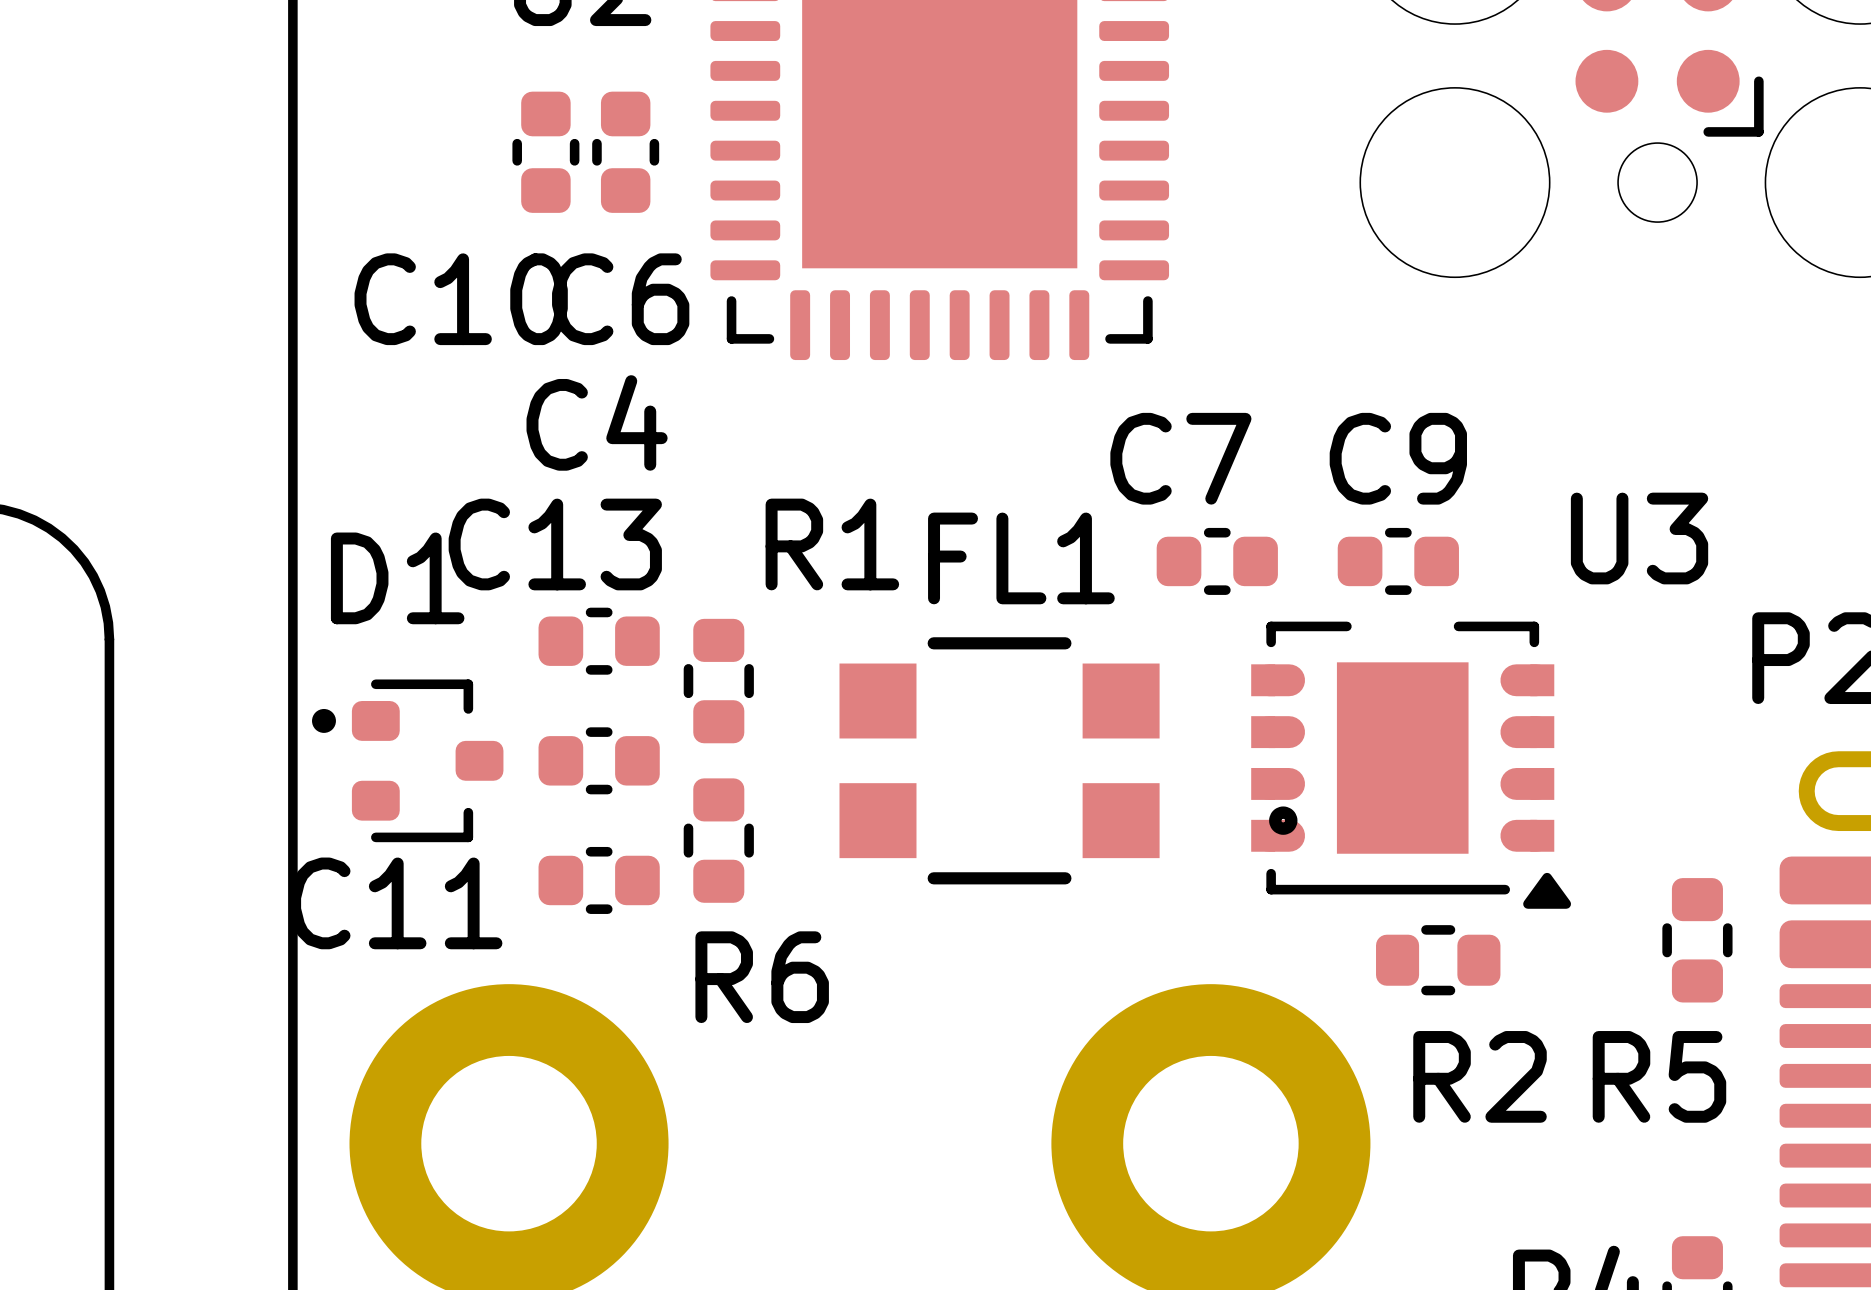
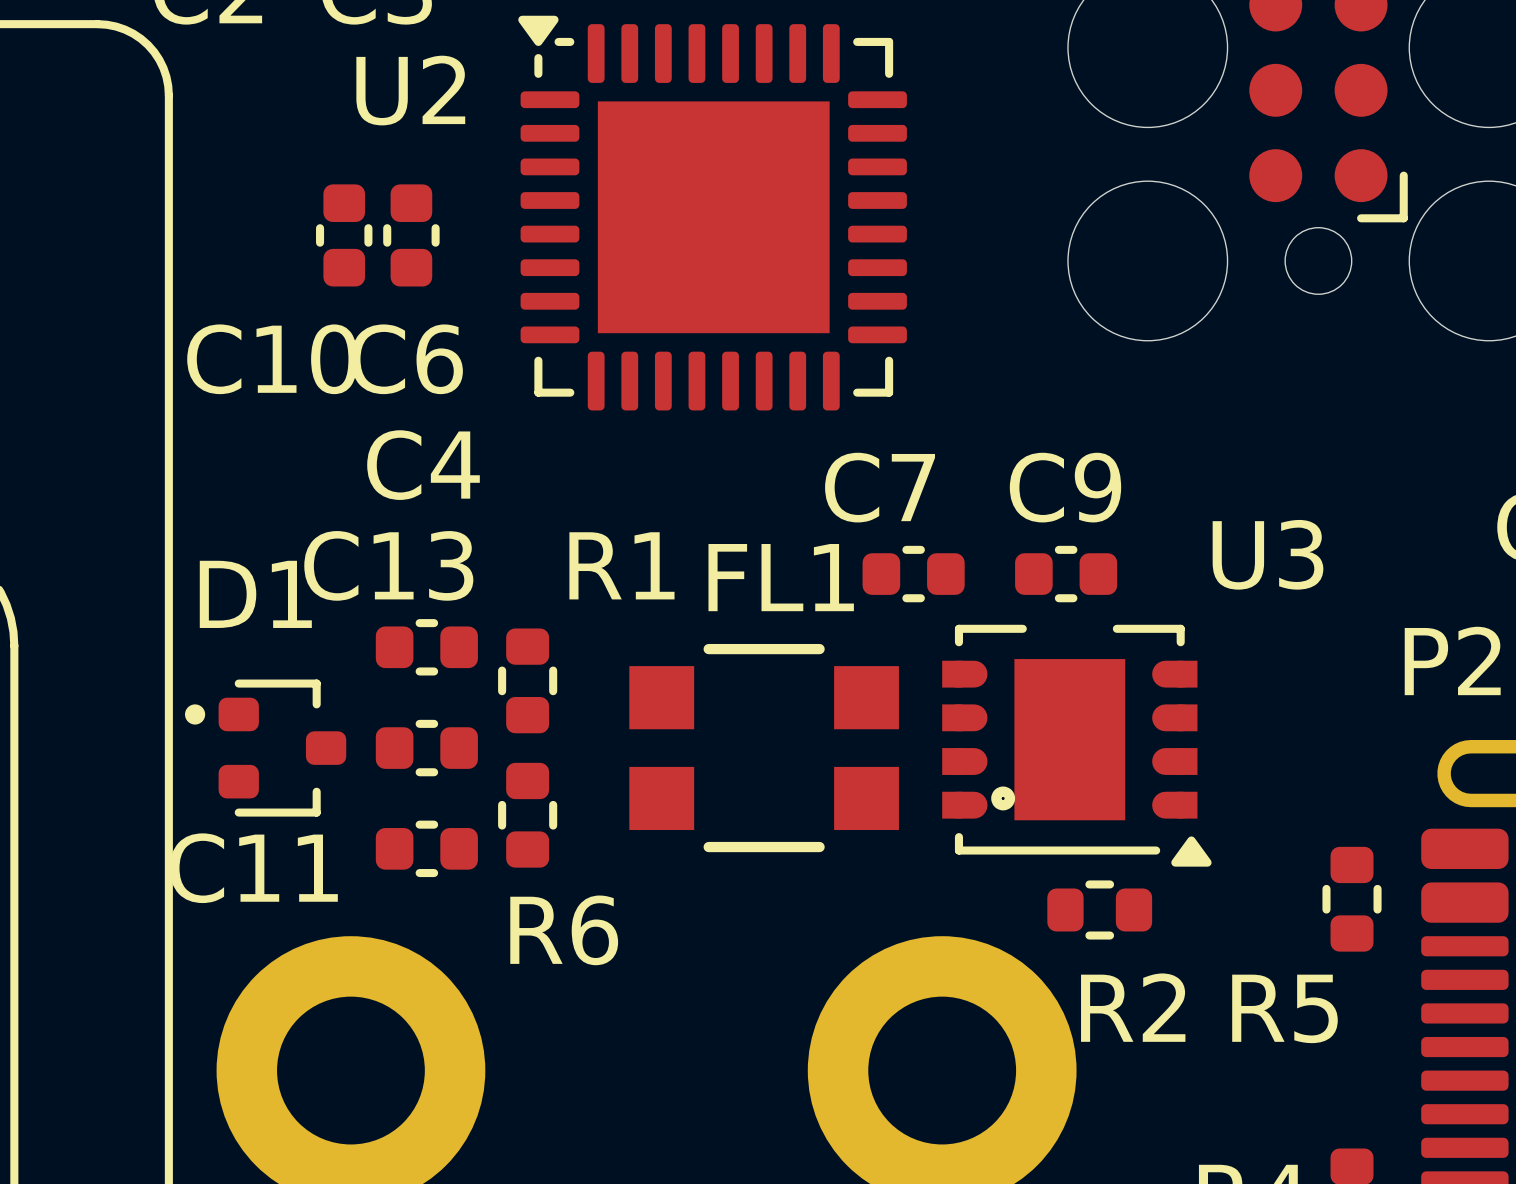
C10 position: (545, 152) -> (344, 235)
C6 position: (625, 152) -> (411, 235)
C7 position: (1217, 561) -> (913, 574)
C9 position: (1398, 561) -> (1066, 574)
U3 position: (1411, 765) -> (1076, 745)
R2 position: (1438, 960) -> (1099, 909)
R5 name position: R5 (1659, 1076) -> R5 (1284, 1008)

